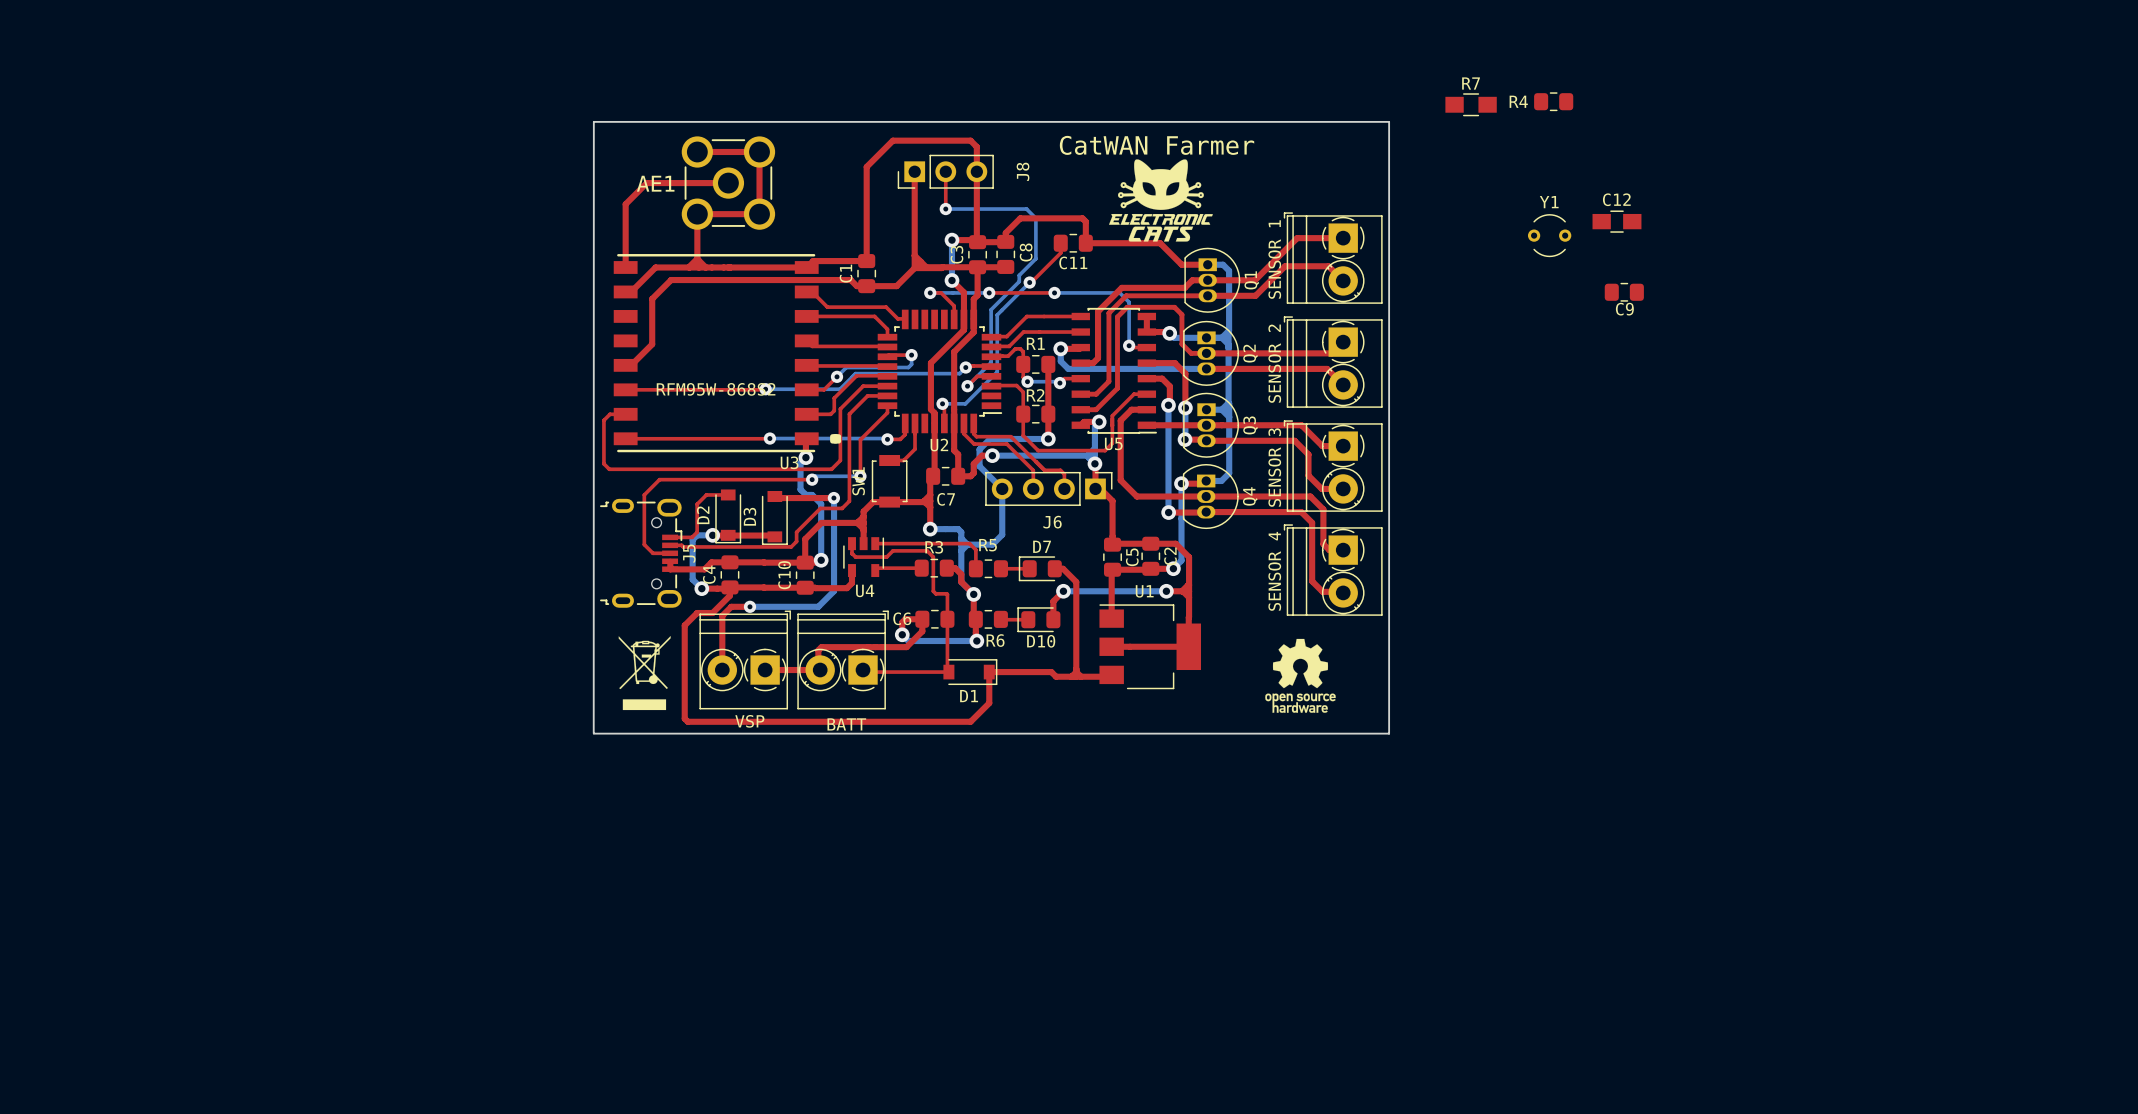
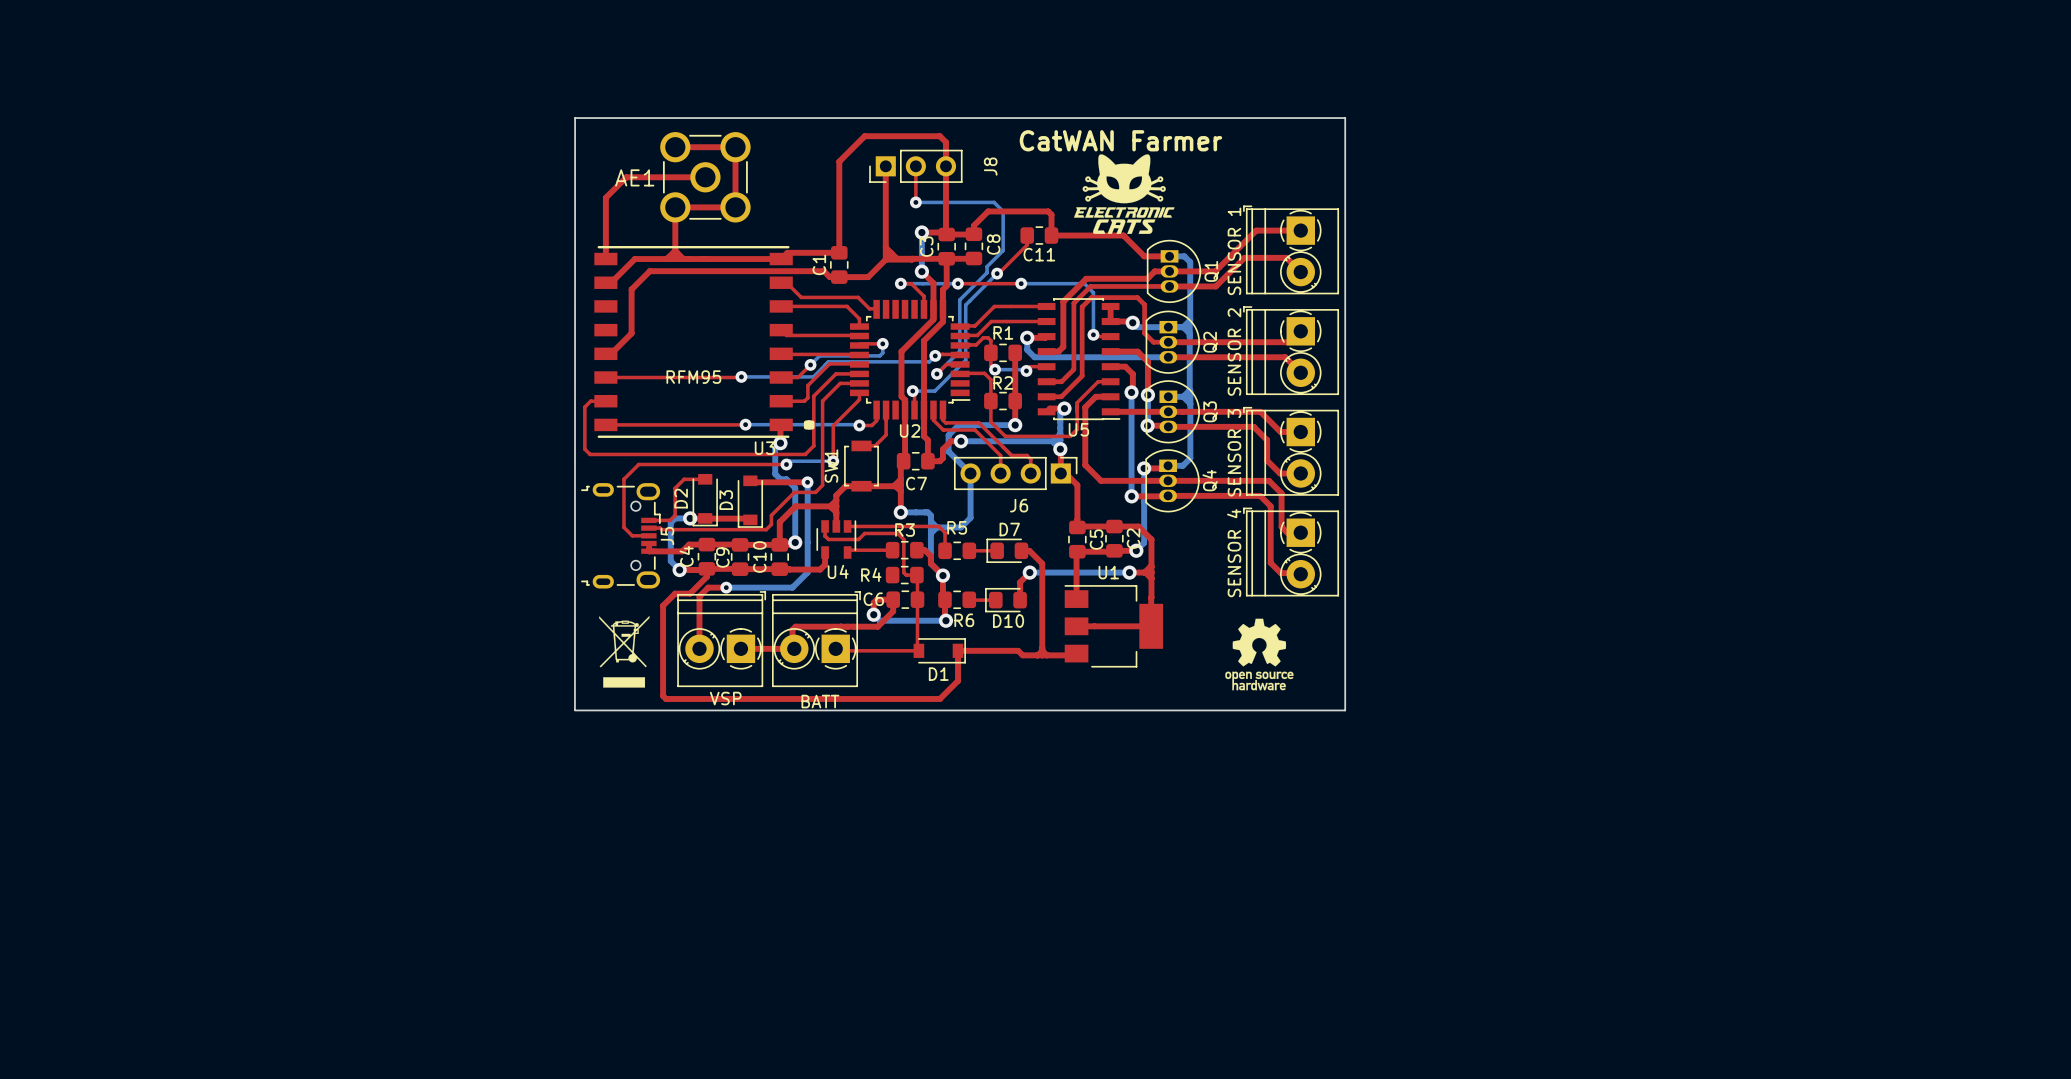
R4 position: (1553, 101) -> (904, 575)
R7: (1471, 104) -> none
C12: (1616, 221) -> none
Y1: (1549, 235) -> none
C9 rotation: 0° (1624, 292) -> 90° clockwise (740, 557)
C9 position: (1624, 292) -> (740, 557)
U3 value: RFM95W-868S2 (716, 389) -> RFM95 (693, 377)

